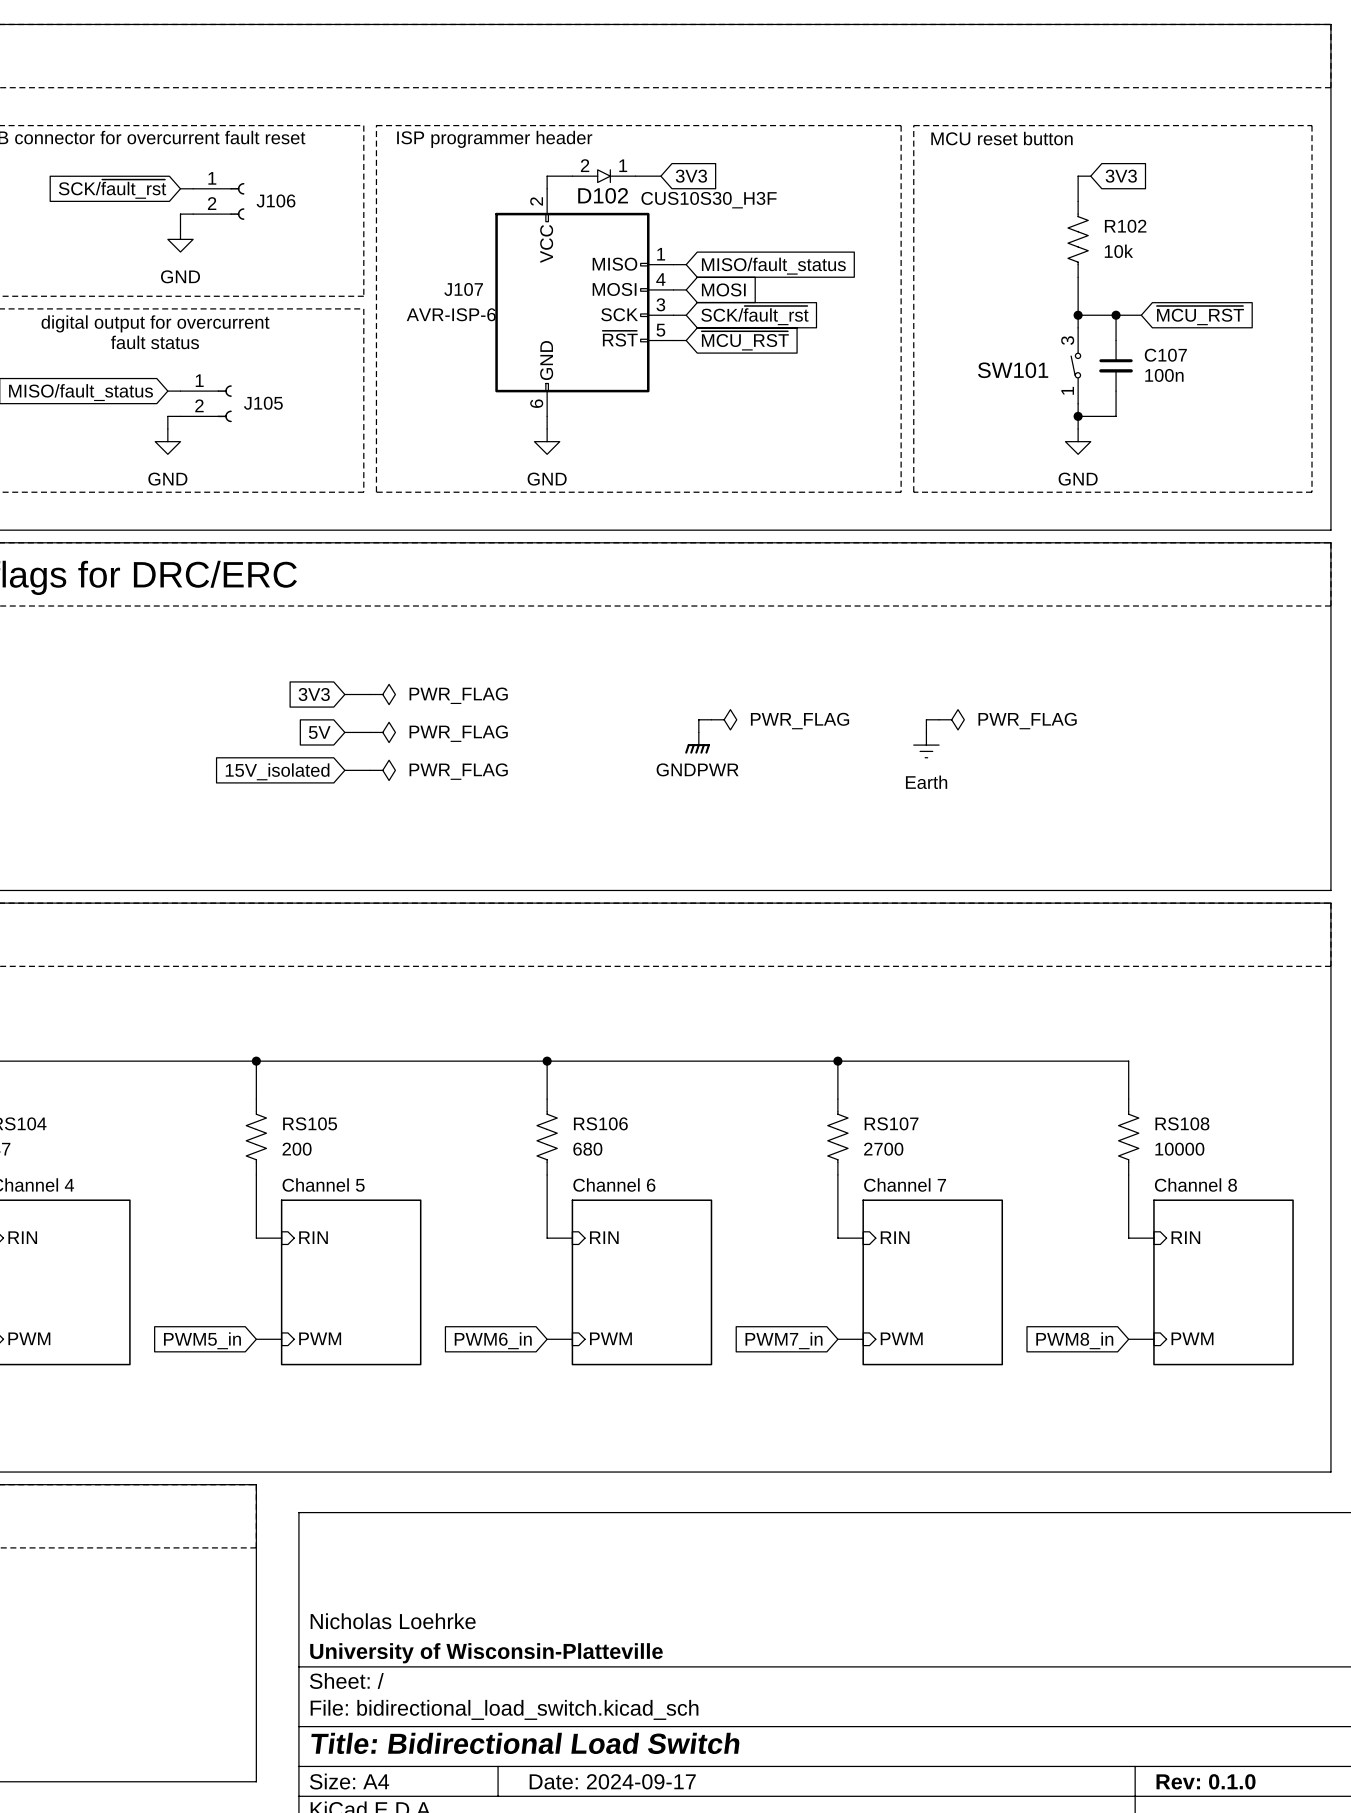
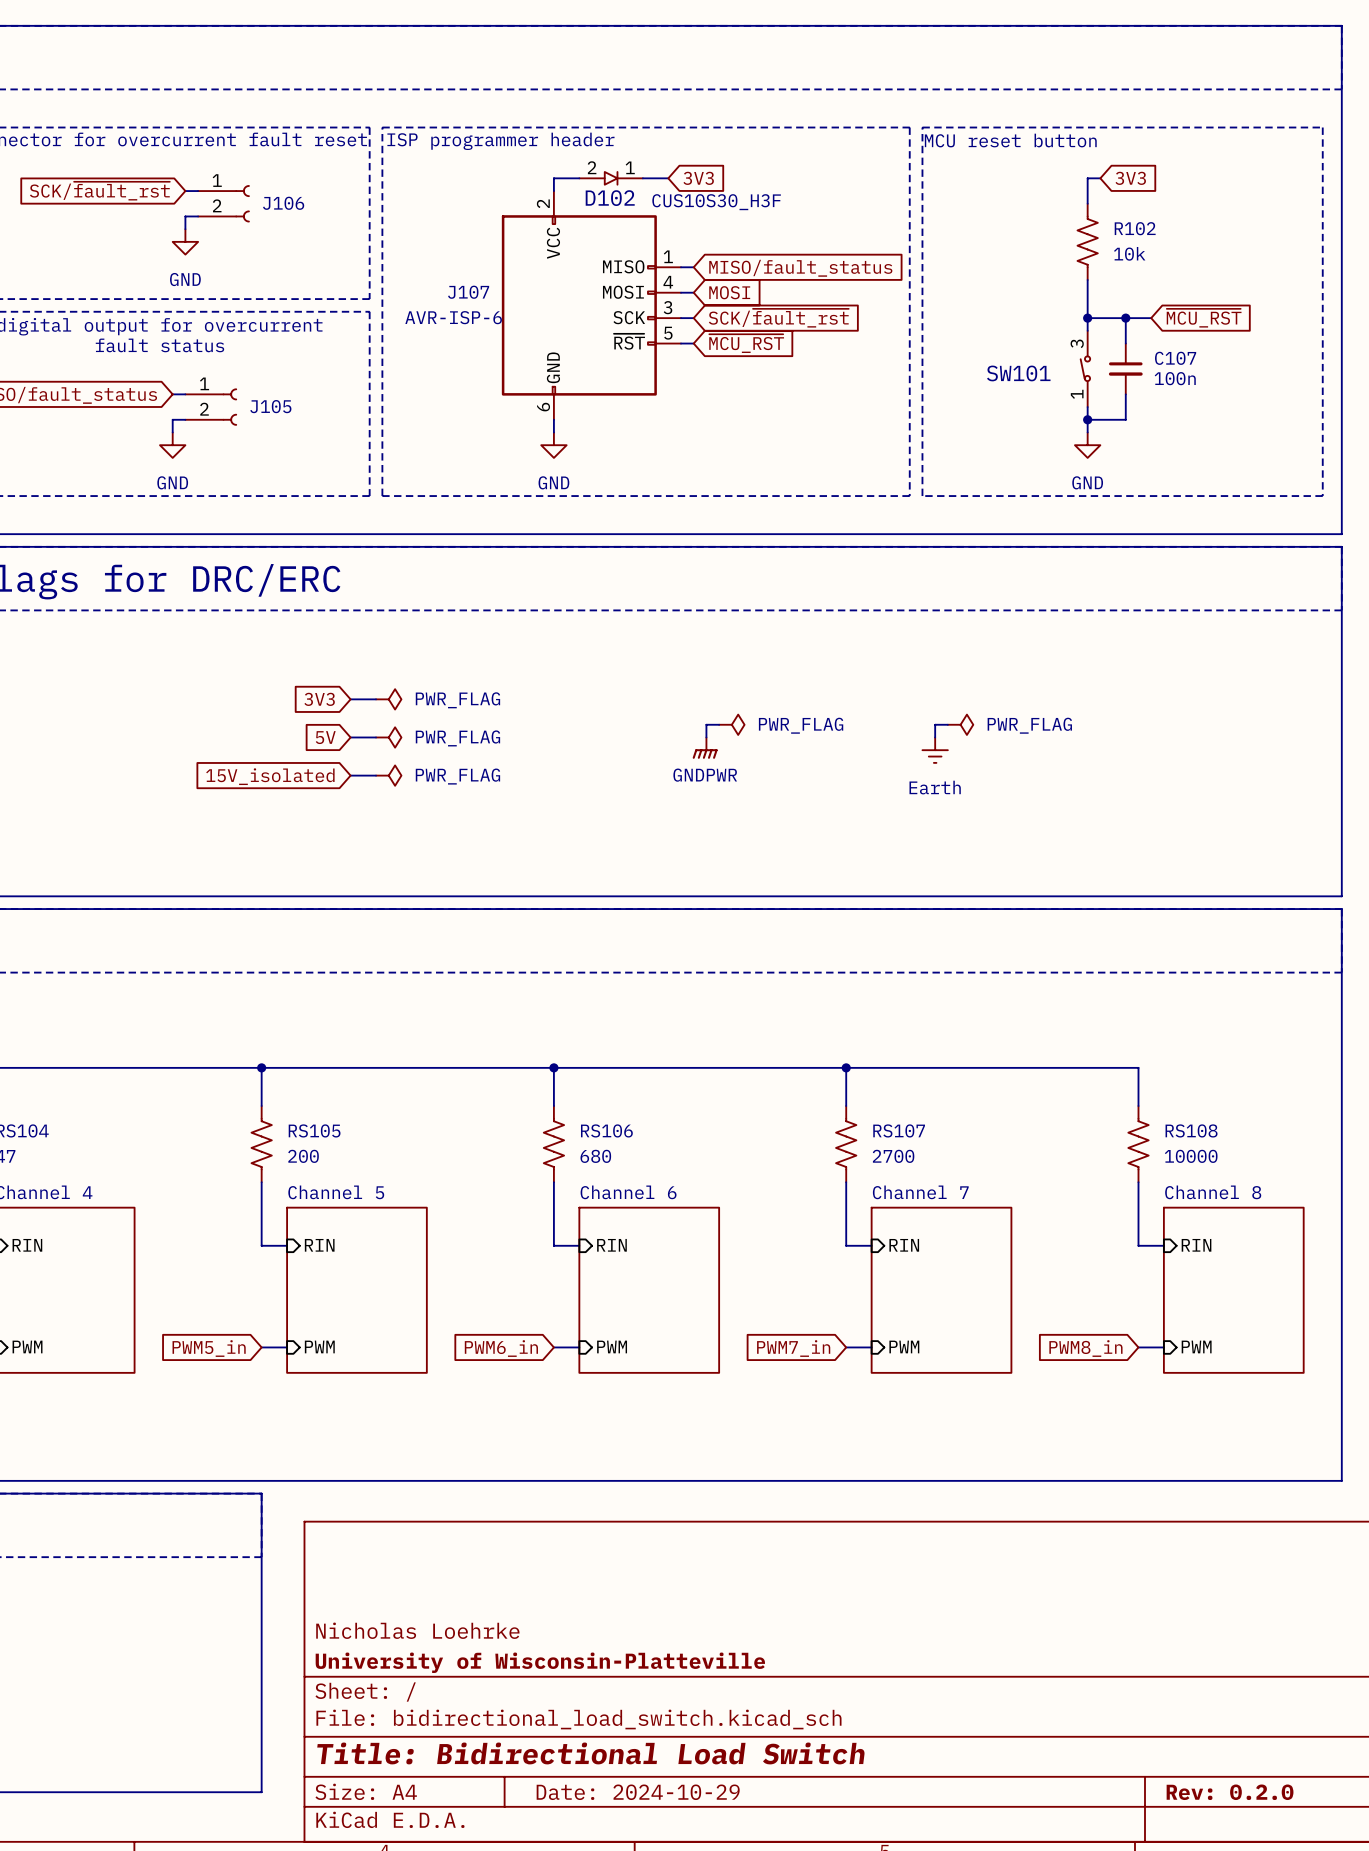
title block: Date: 2024-09-17 (612, 1781) -> Date: 2024-10-29 (638, 1792)
title block: Rev: 0.1.0 (1206, 1781) -> Rev: 0.2.0 (1230, 1792)

